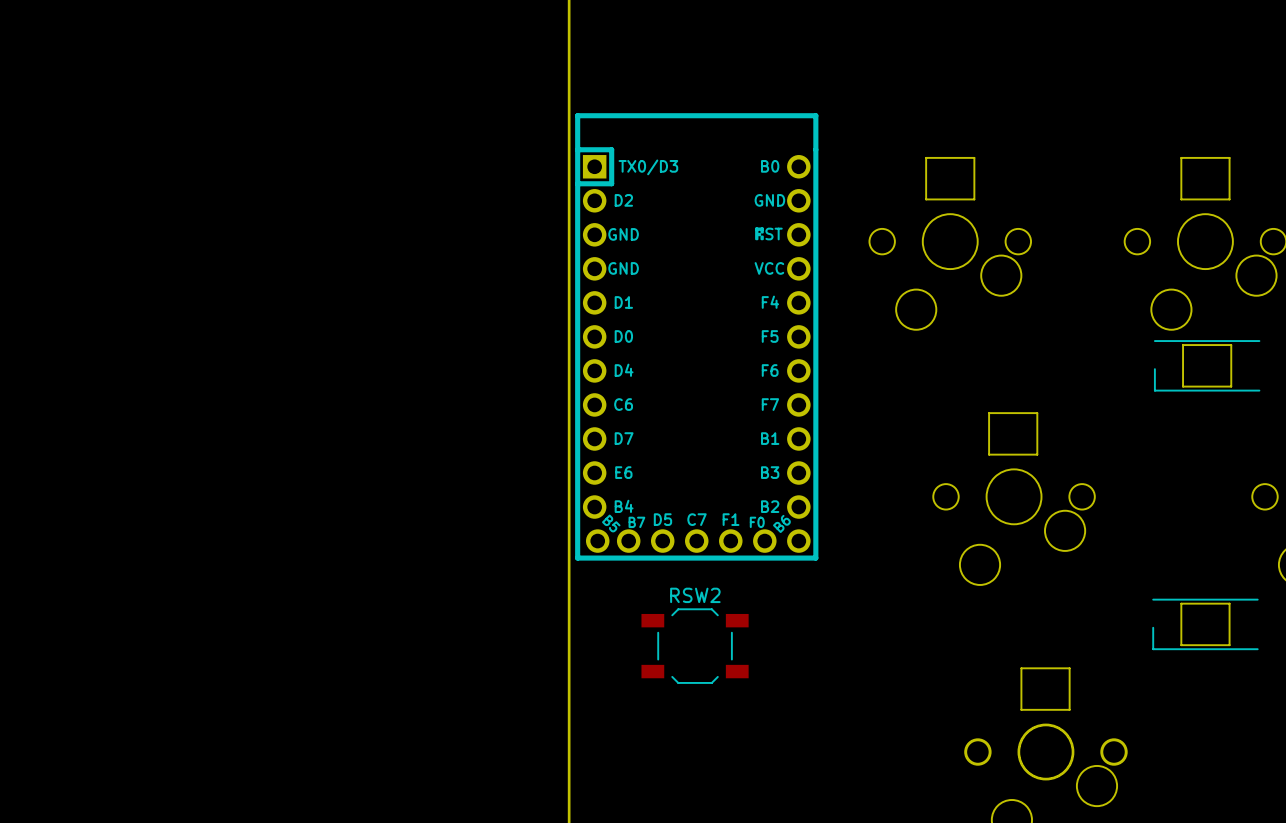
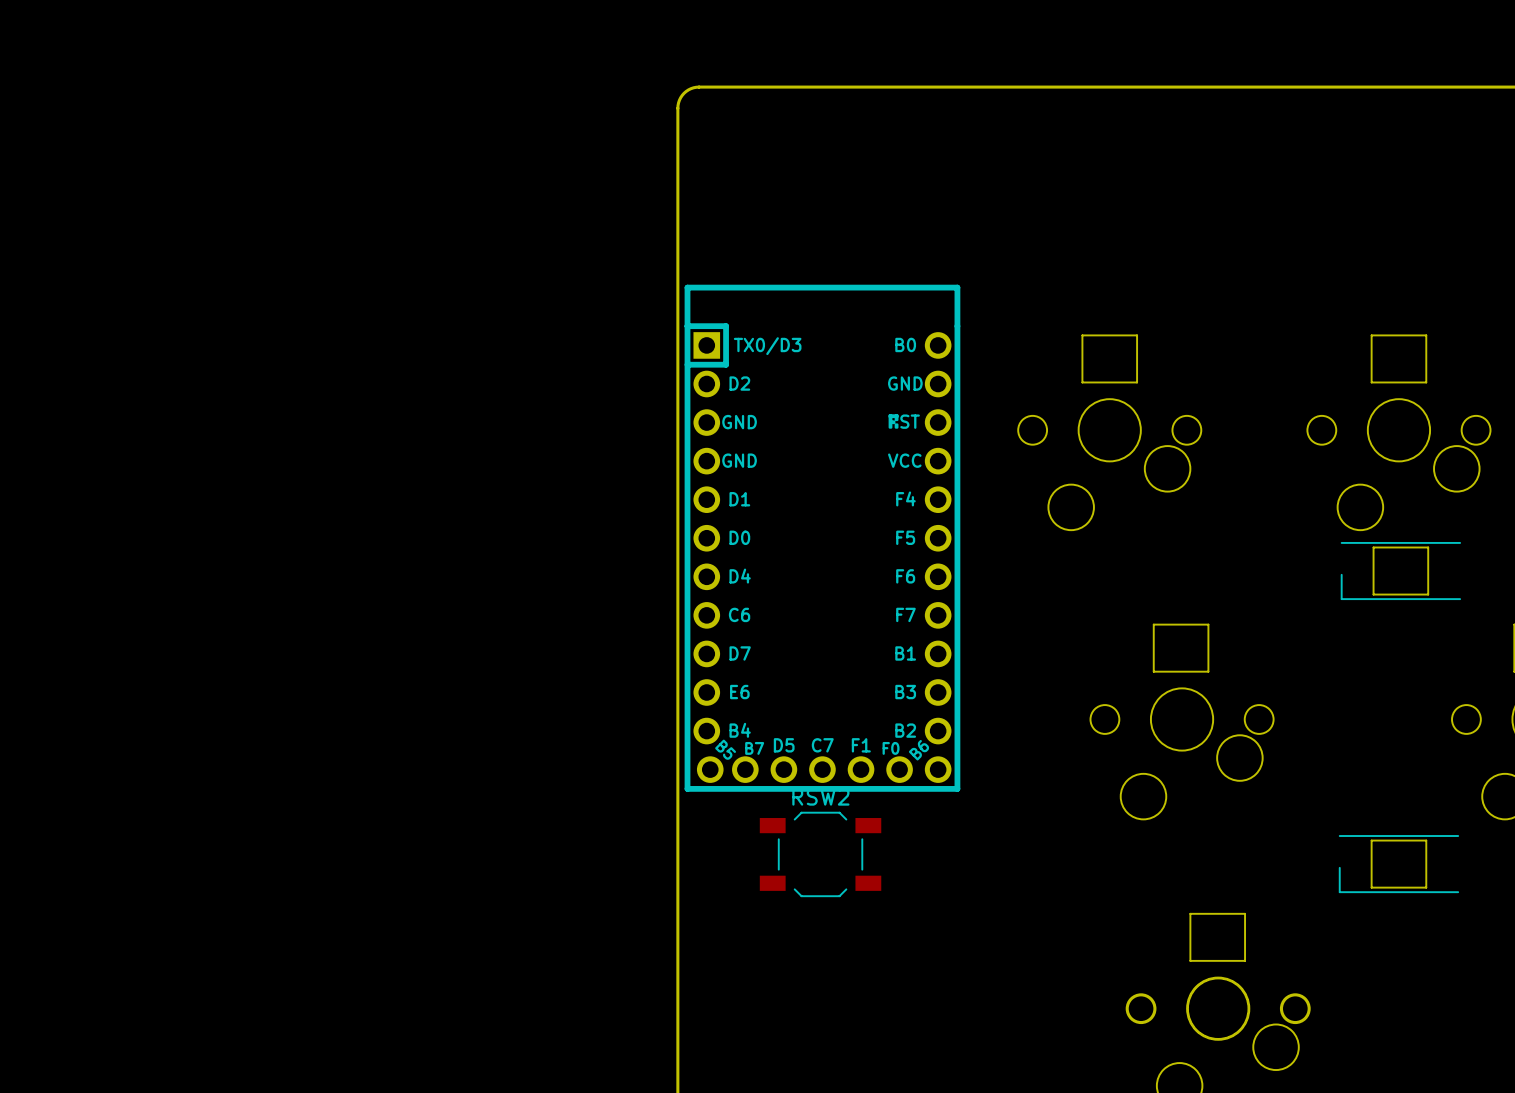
RSW2 position: (695, 646) -> (820, 854)

